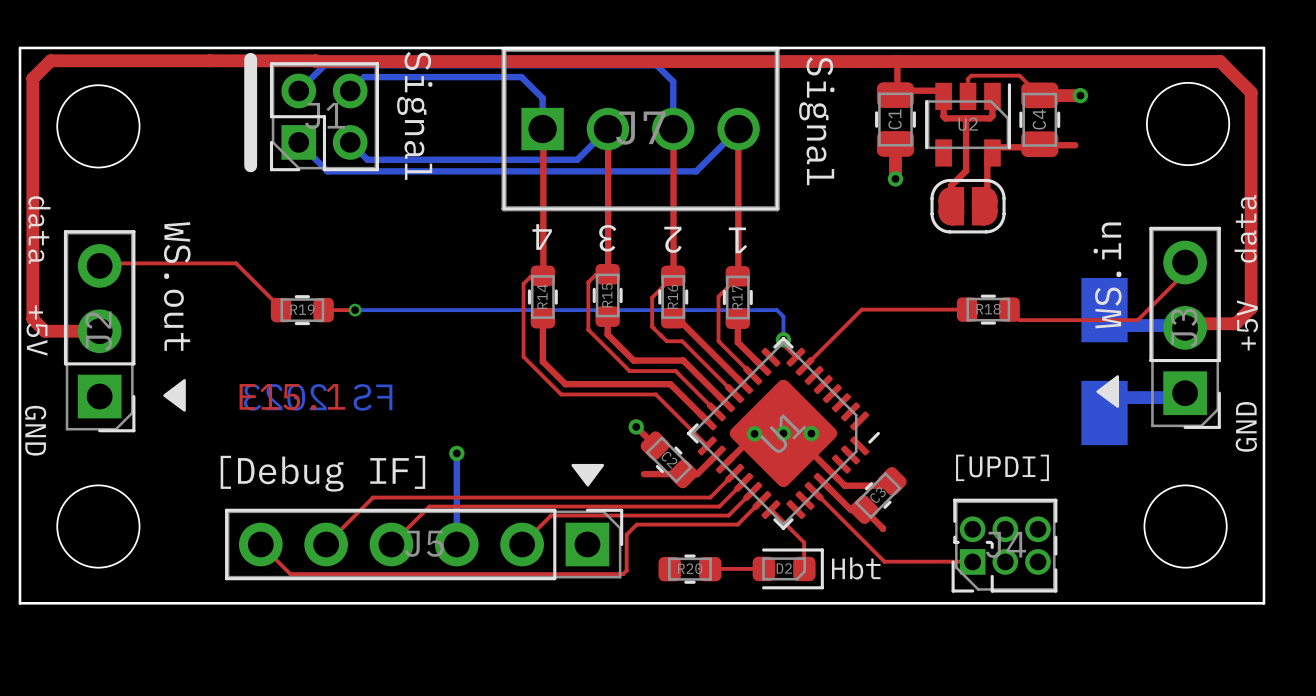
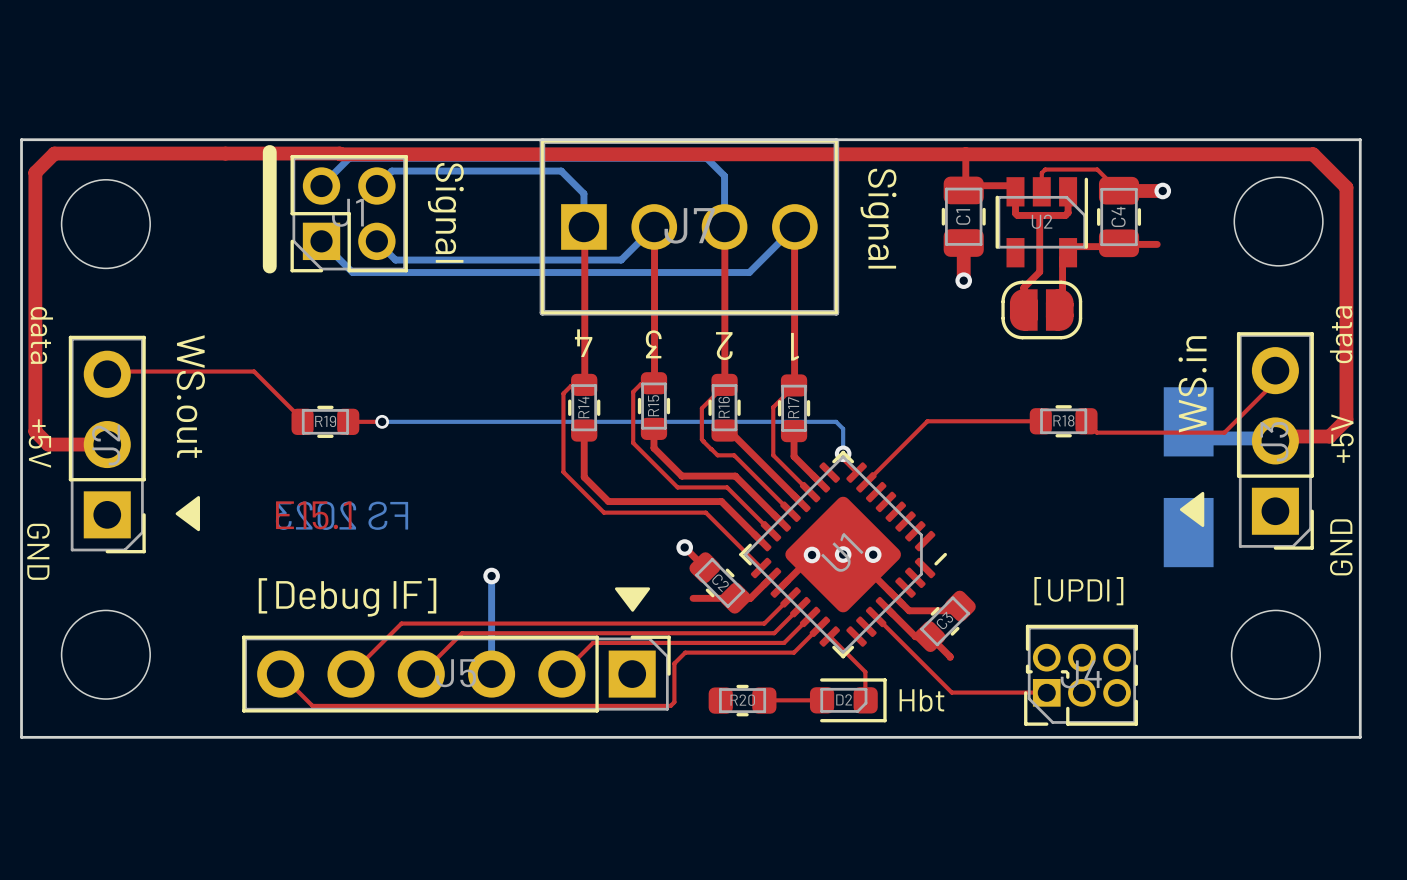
bottom track: (1104, 397) (1180, 397) -> none

